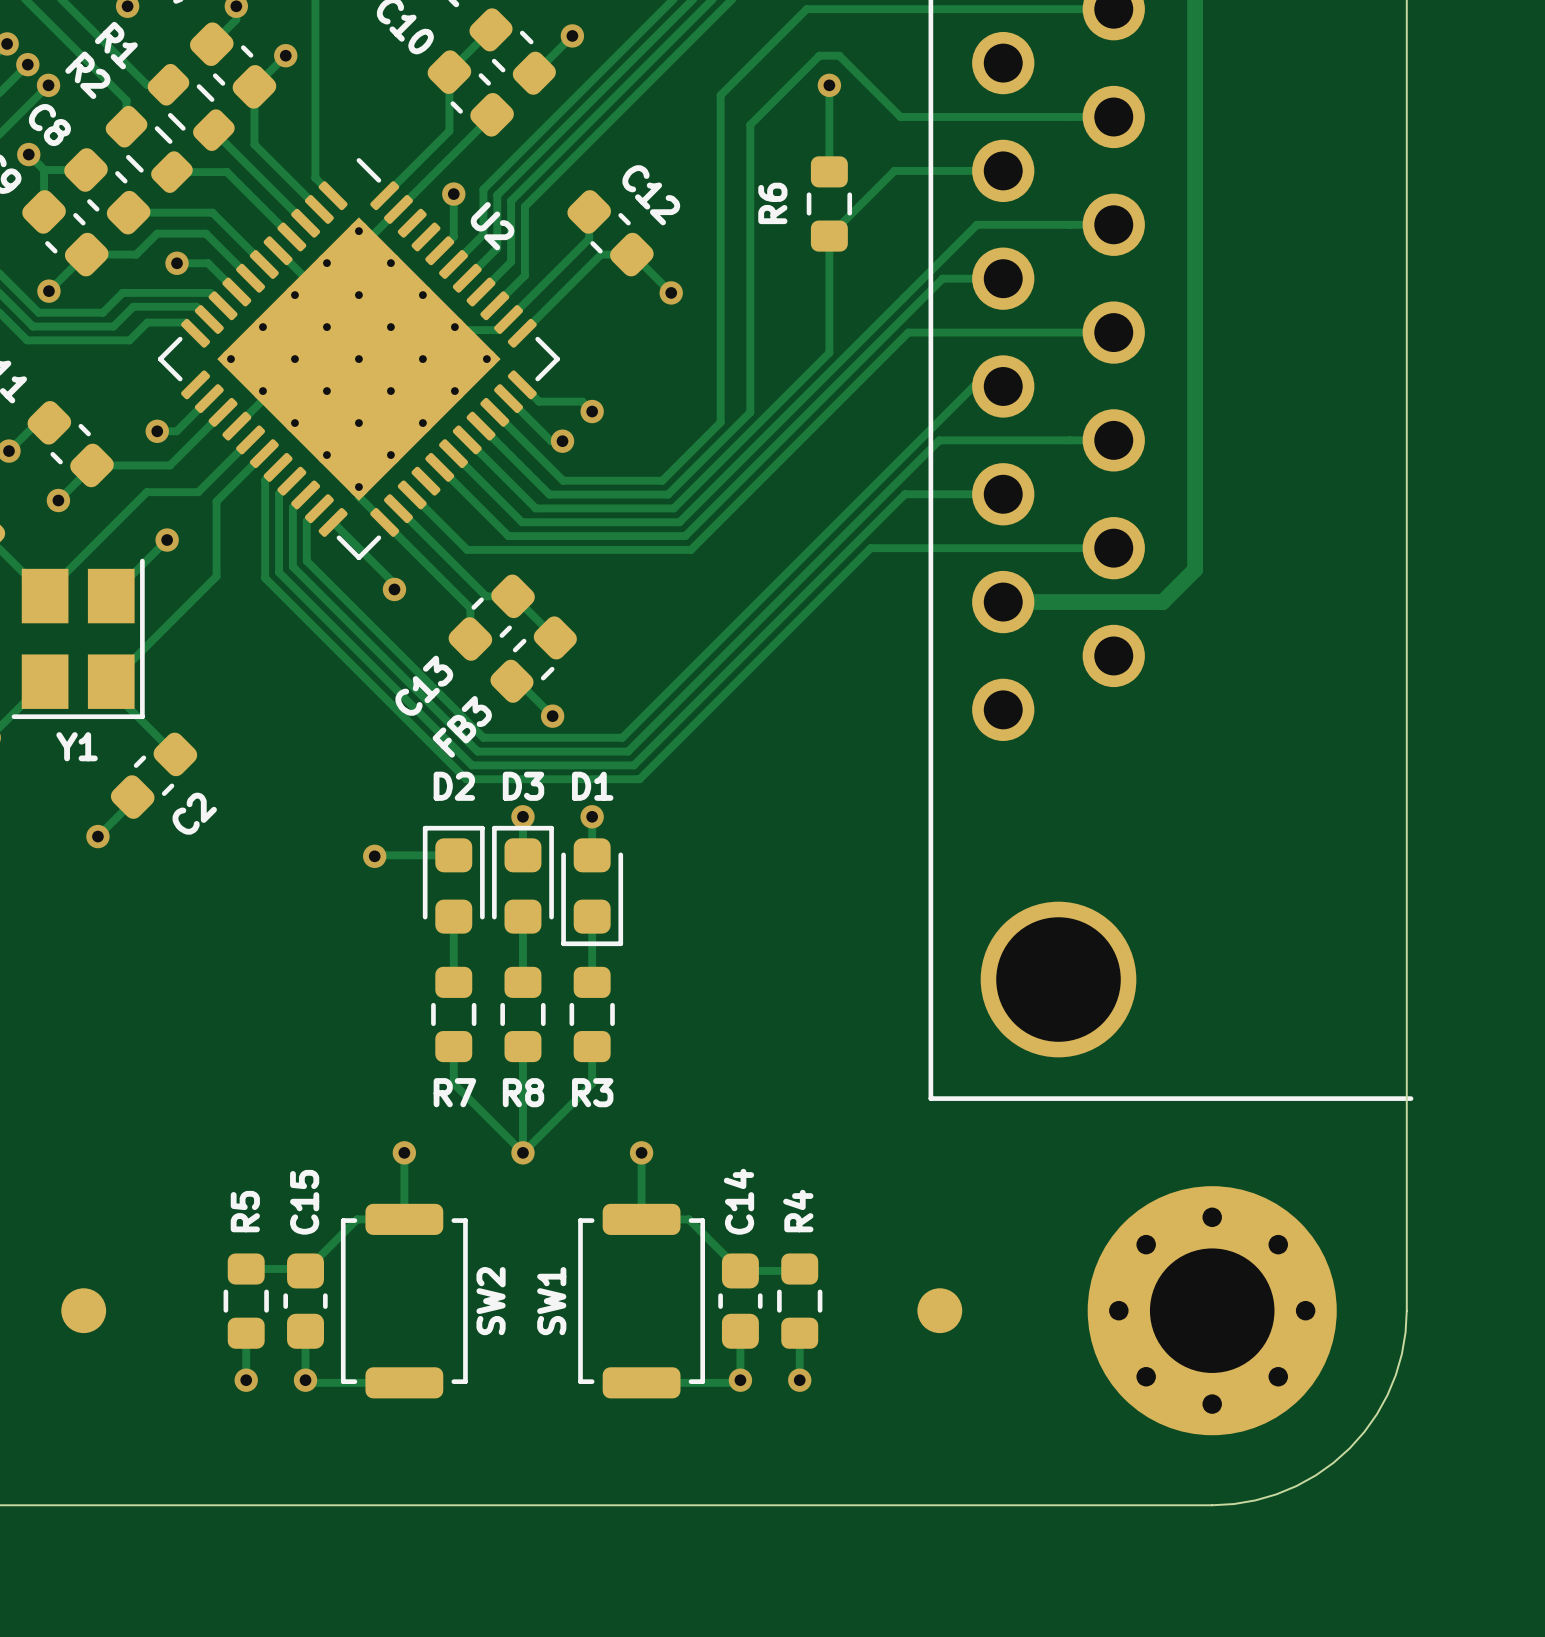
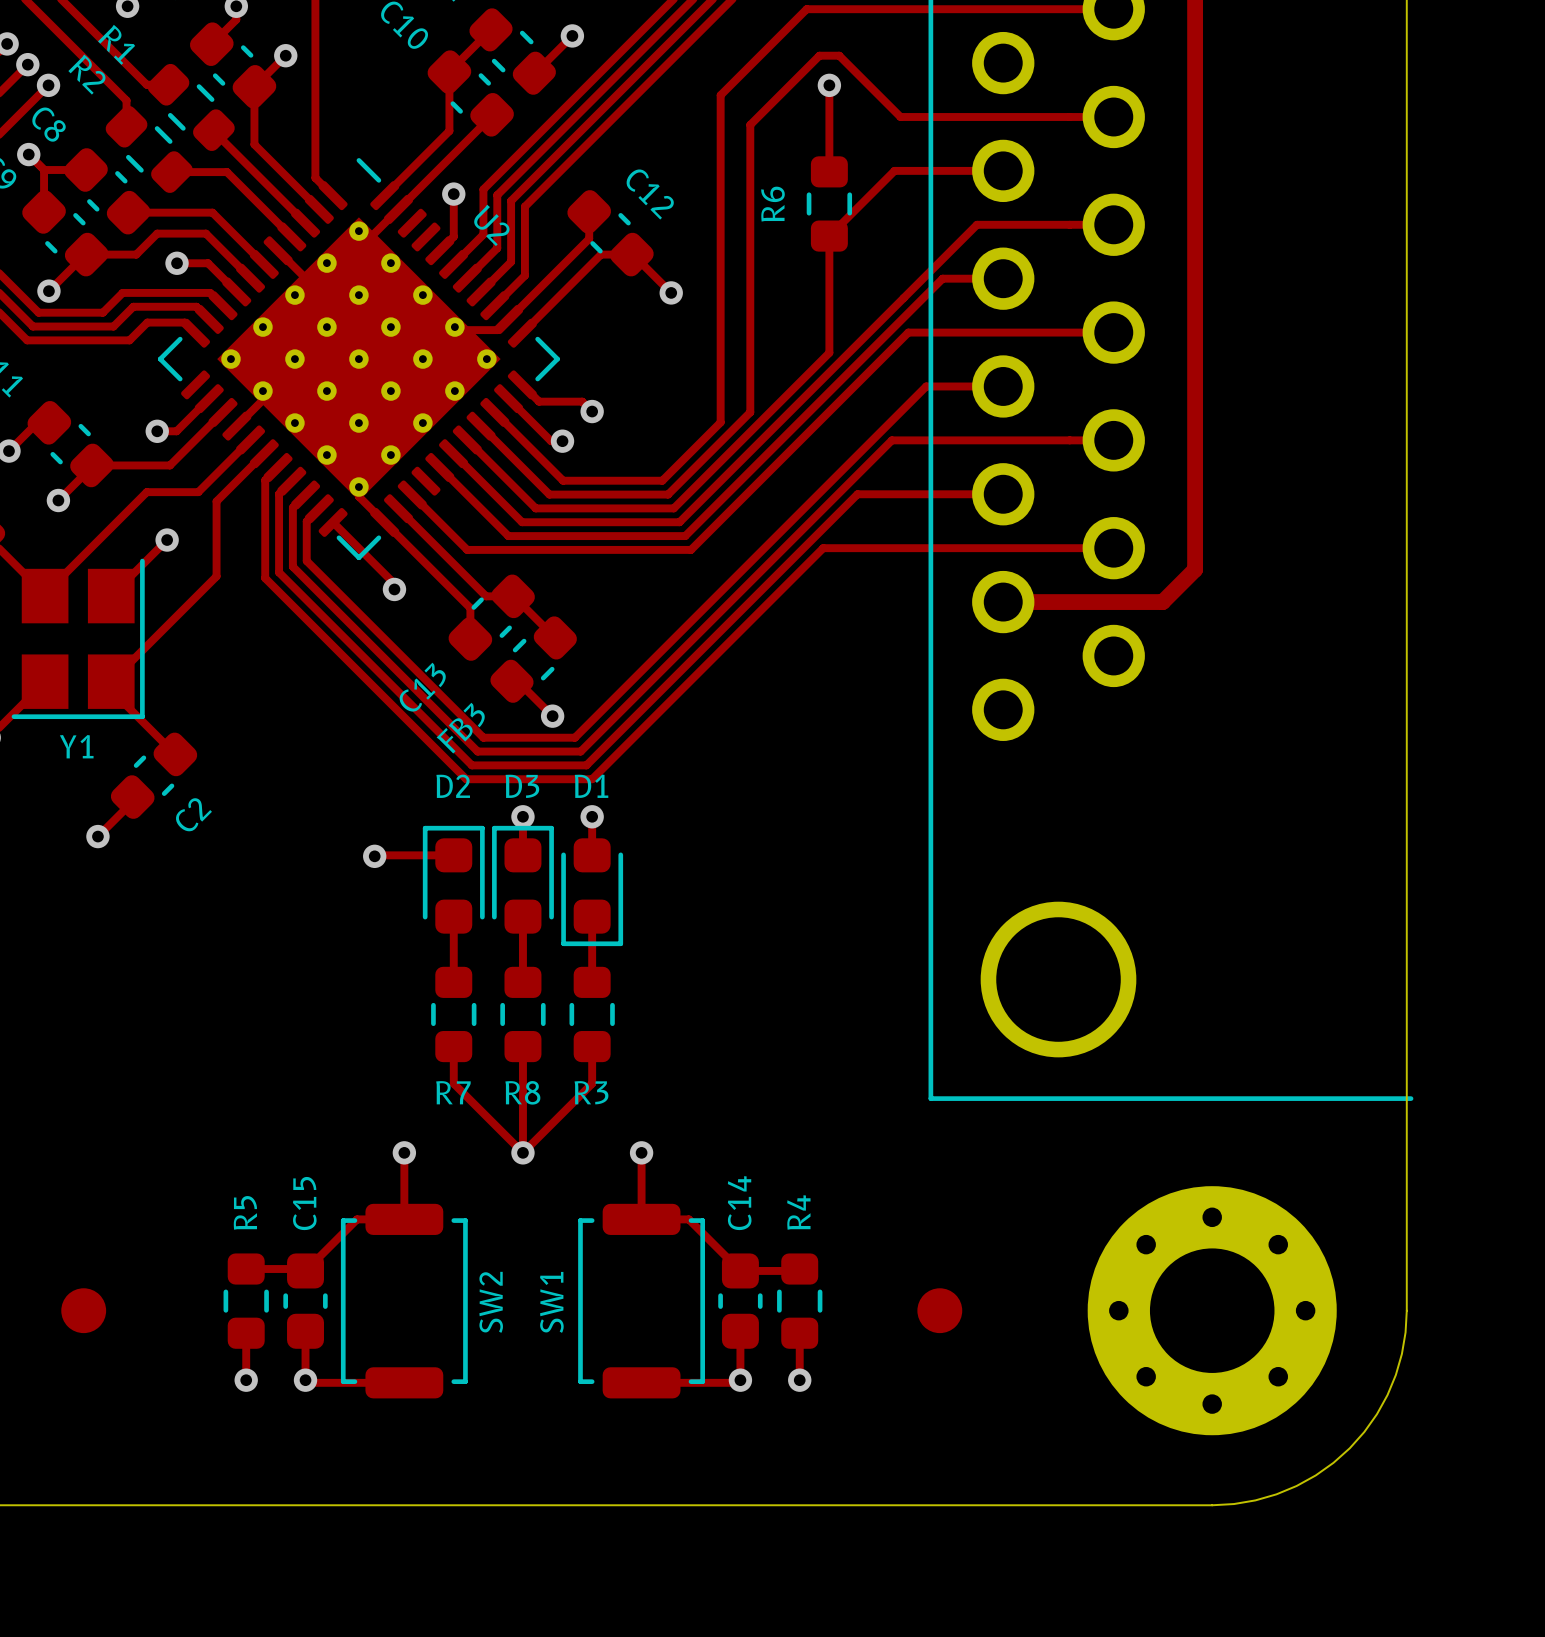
track: (973, 386) (622, 737) (574, 737) -> (973, 386) (926, 386) (574, 737)
track: (939, 440) (628, 751) (580, 751) -> (939, 440) (891, 440) (580, 751)
track: (904, 494) (633, 765) (586, 765) -> (904, 494) (857, 494) (586, 765)
track: (870, 548) (639, 779) (592, 779) -> (870, 548) (823, 548) (592, 779)

